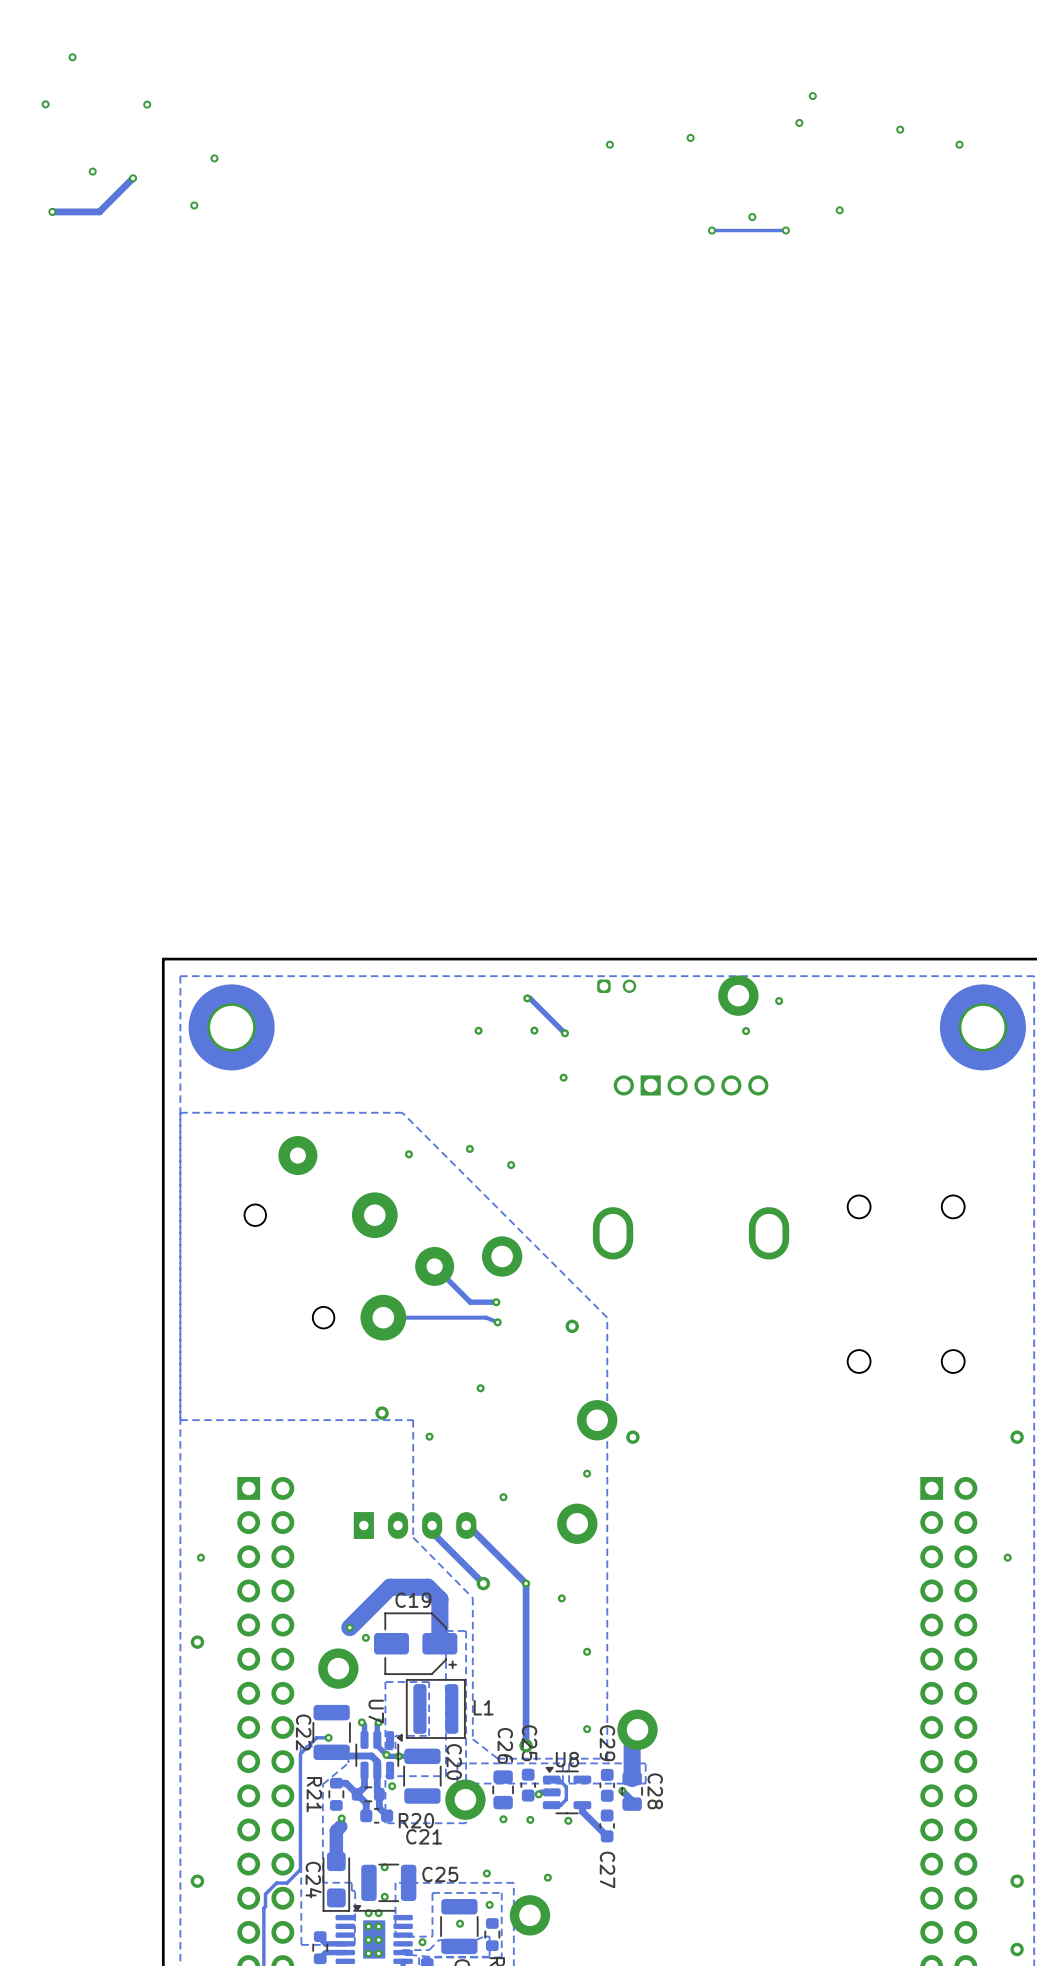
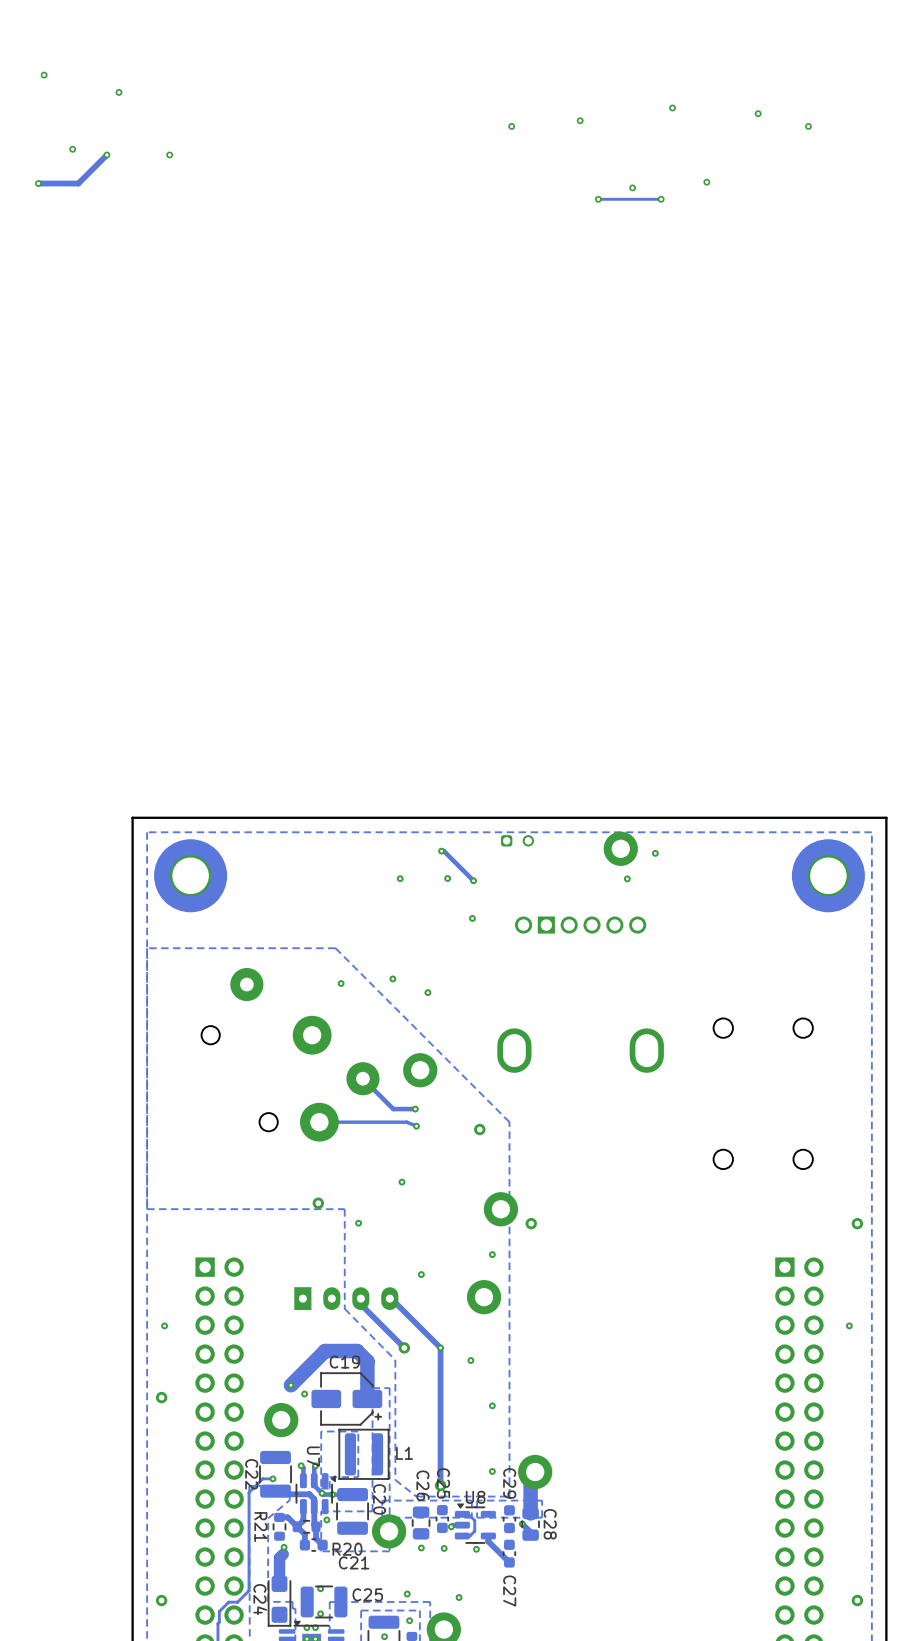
via: (72, 57) -> none
via: none -> (44, 75)
via: (812, 96) -> none
via: (45, 104) -> none
via: (214, 158) -> none
via: none -> (169, 154)
via: (194, 205) -> none

